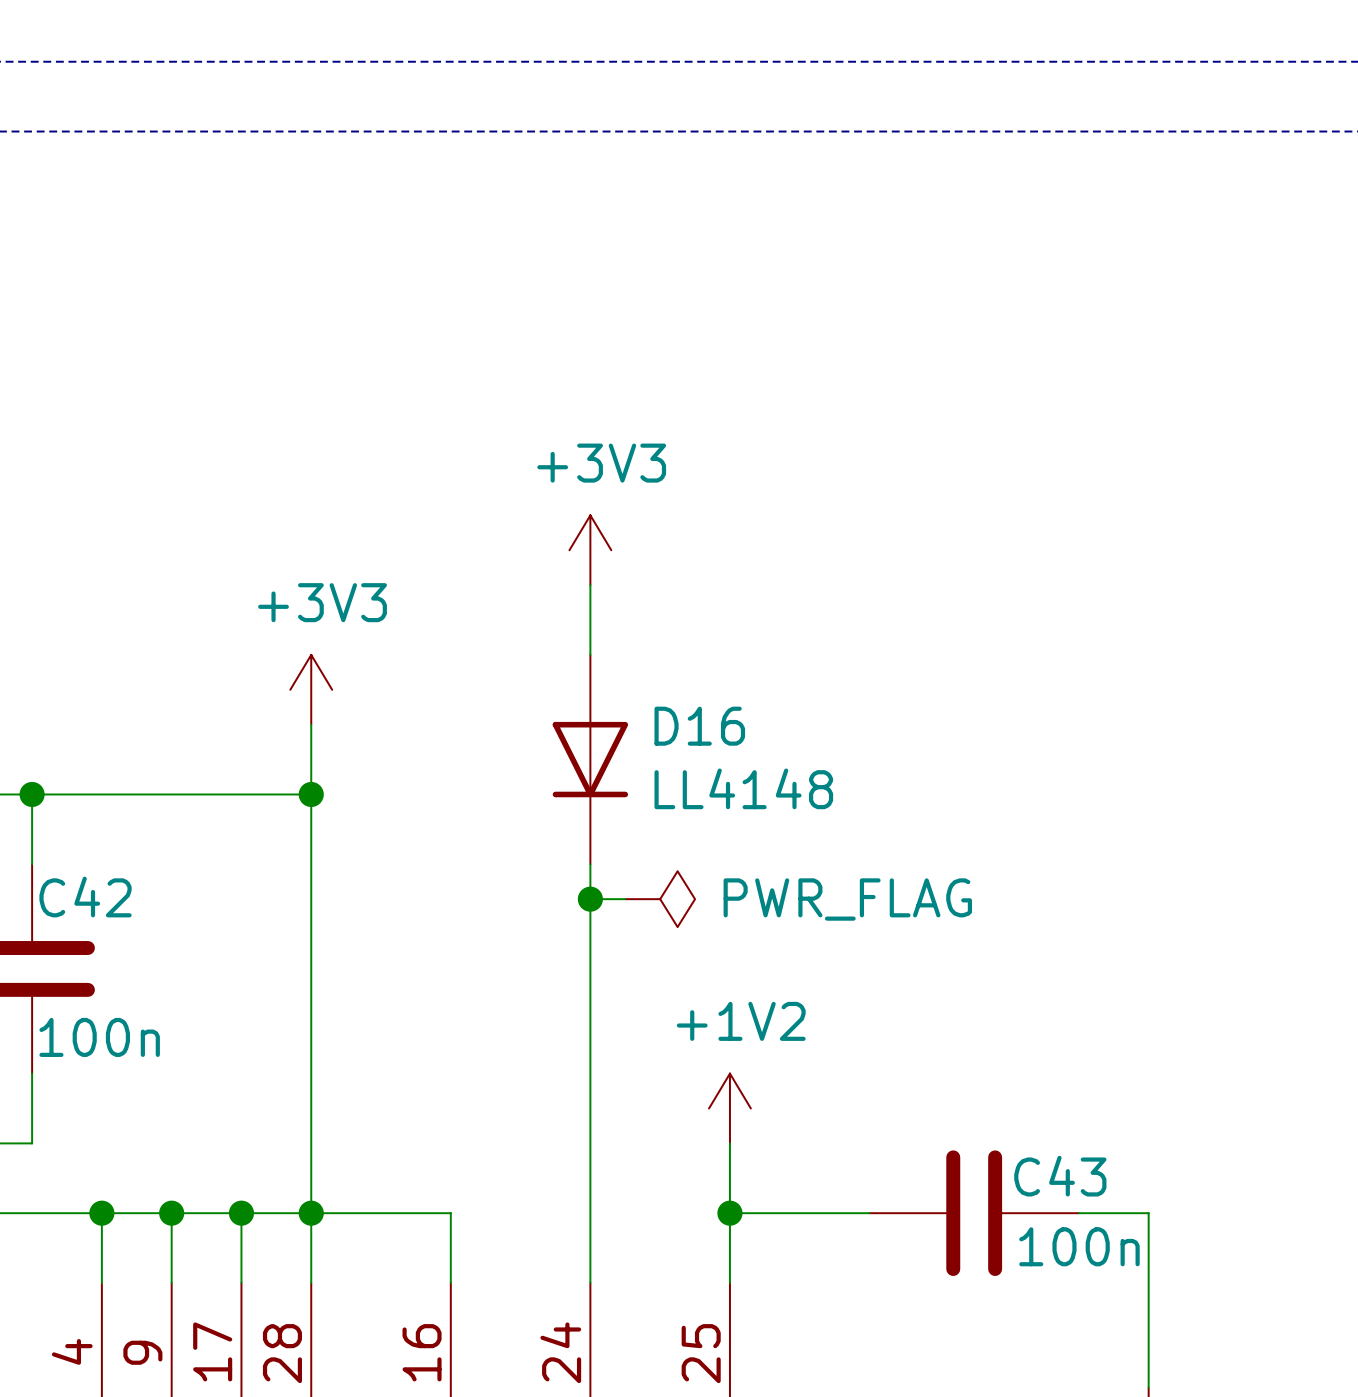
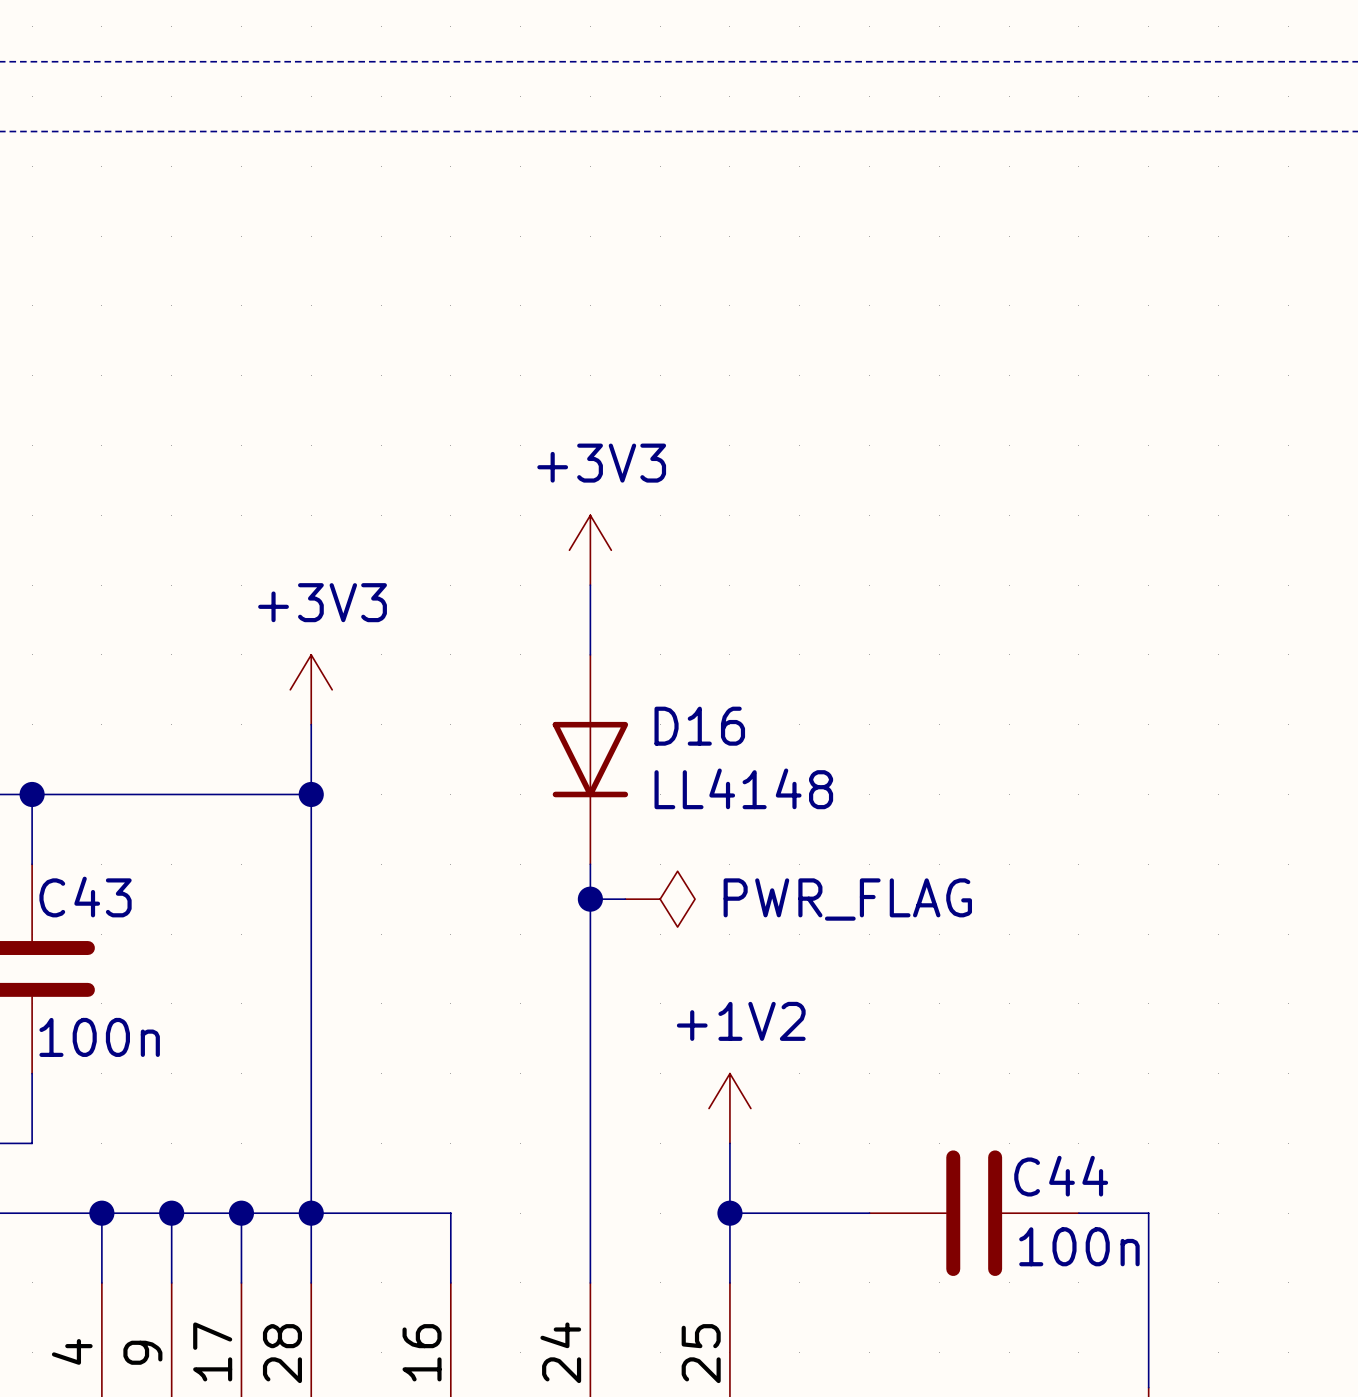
C42 name: C42 (85, 897) -> C43 (85, 897)
C43 name: C43 (1060, 1176) -> C44 (1061, 1176)

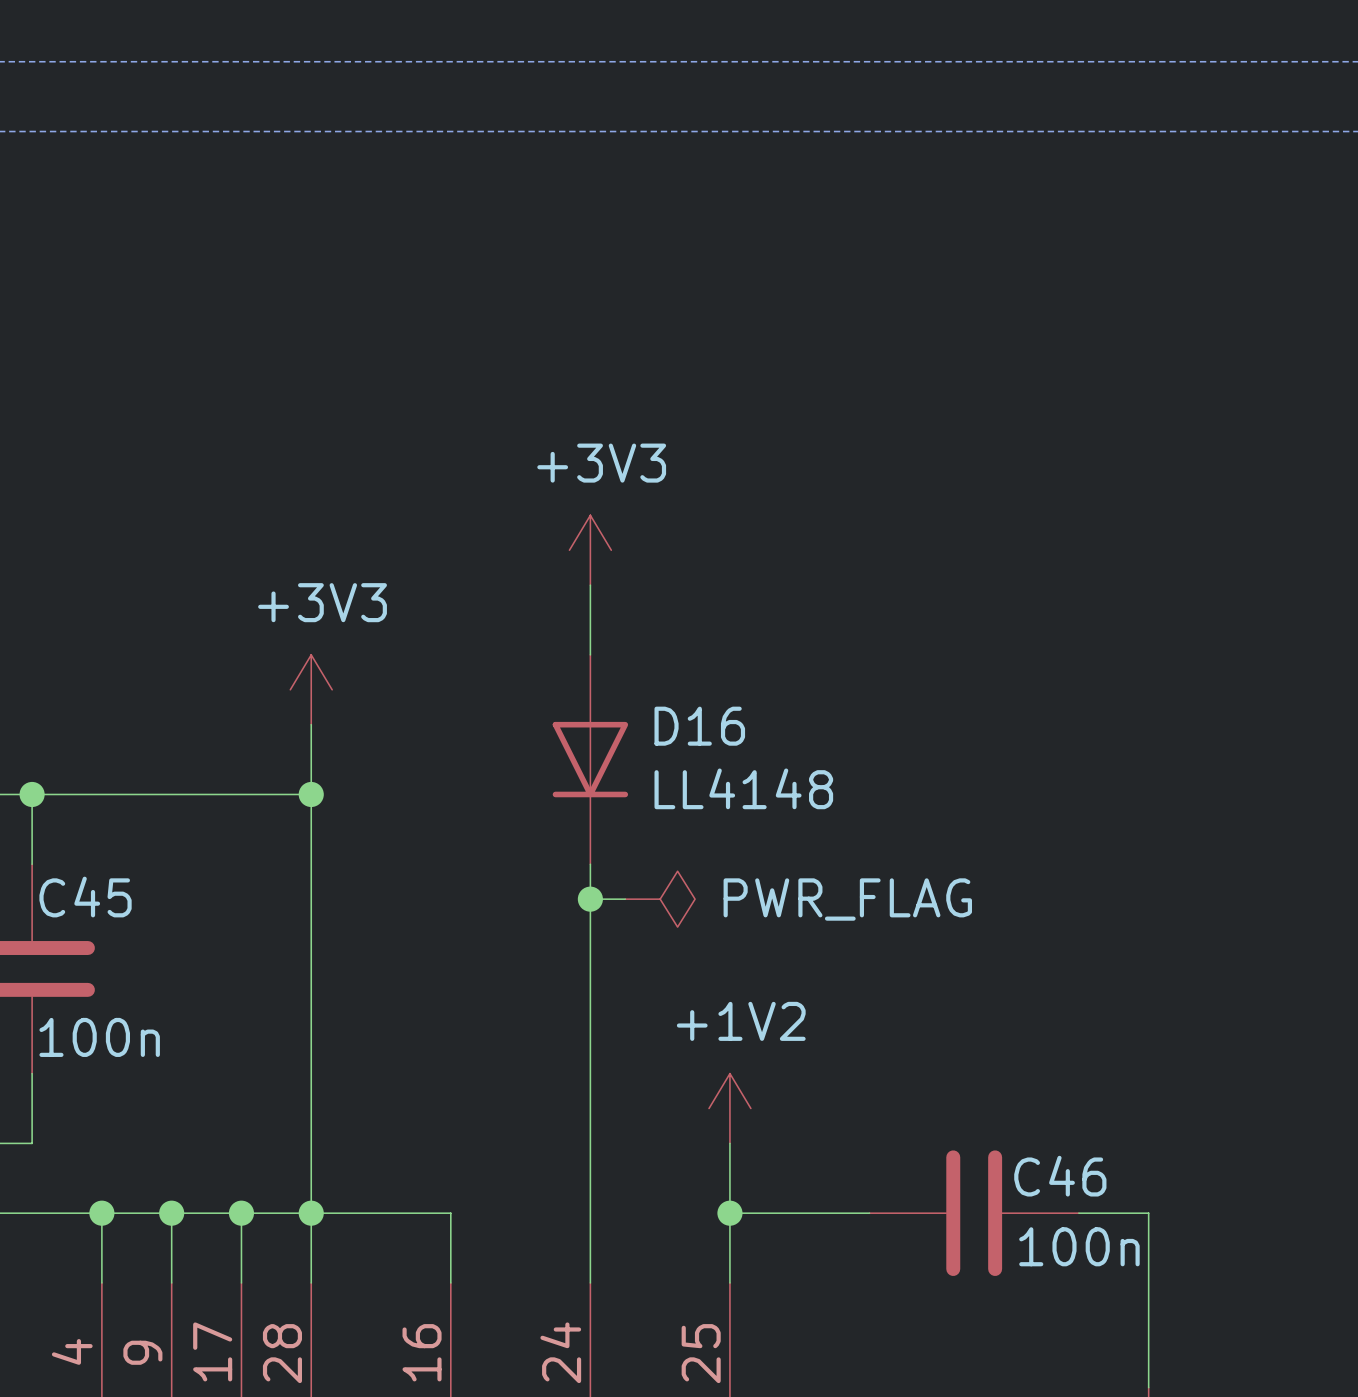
C43 name: C43 (85, 897) -> C45 (85, 897)
C44 name: C44 (1061, 1176) -> C46 (1060, 1176)

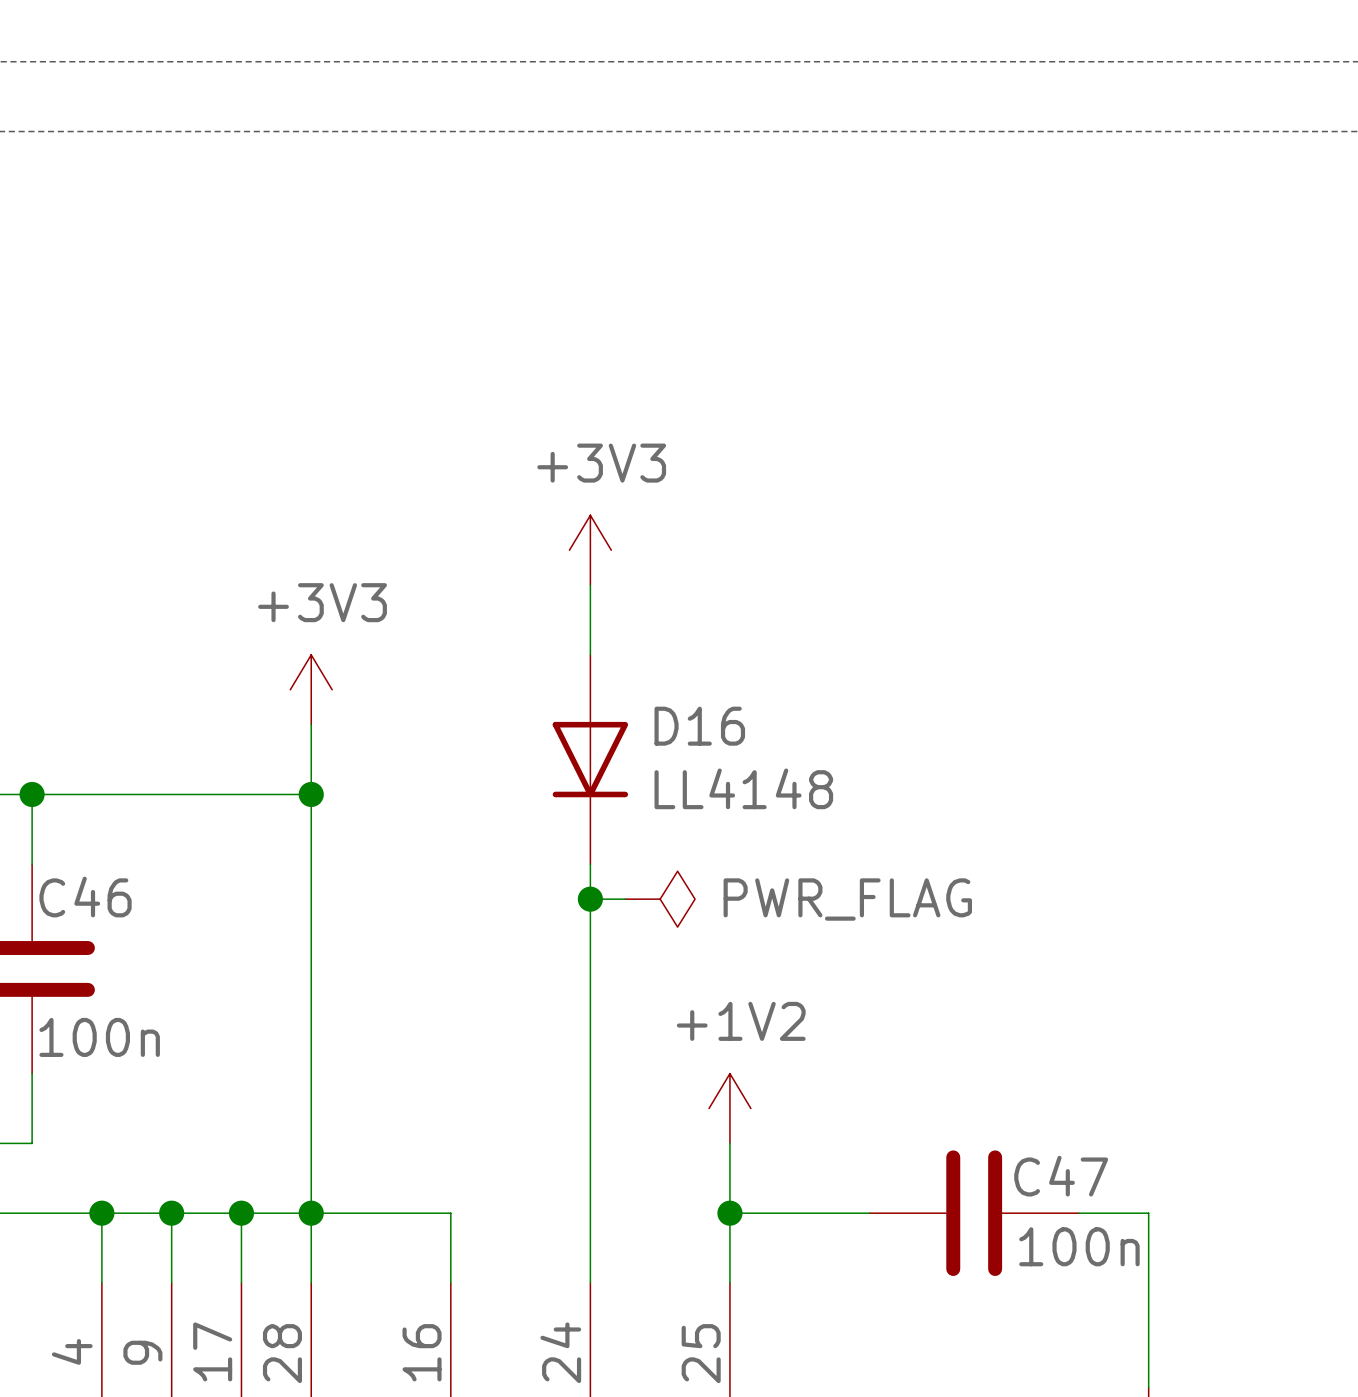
C45 name: C45 (85, 897) -> C46 (85, 897)
C46 name: C46 (1060, 1176) -> C47 (1061, 1176)

